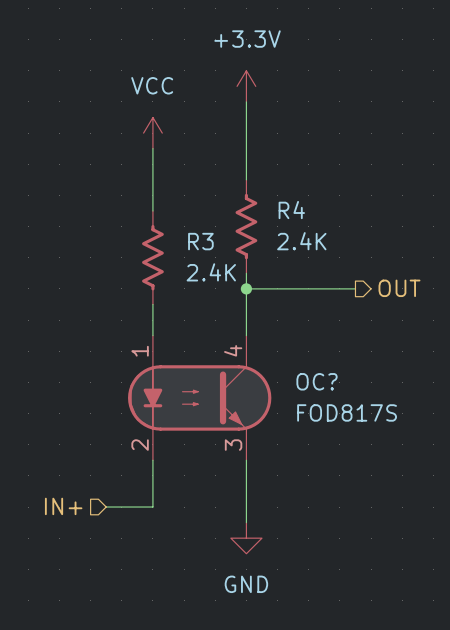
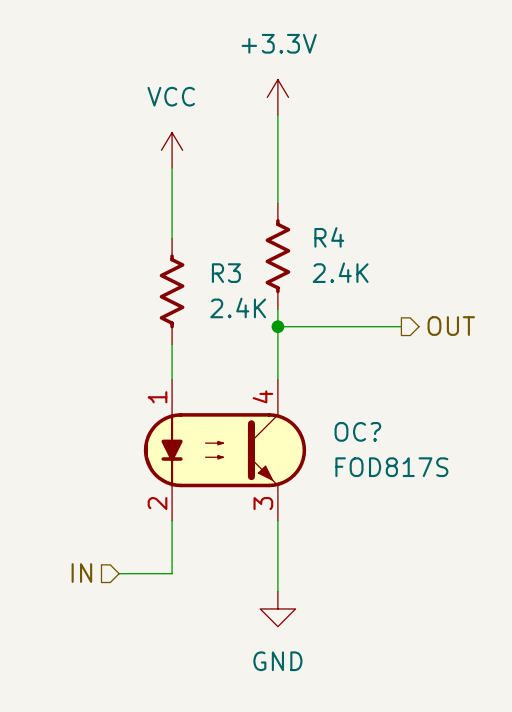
hierarchical label: IN+ (63, 506) -> IN (81, 573)

